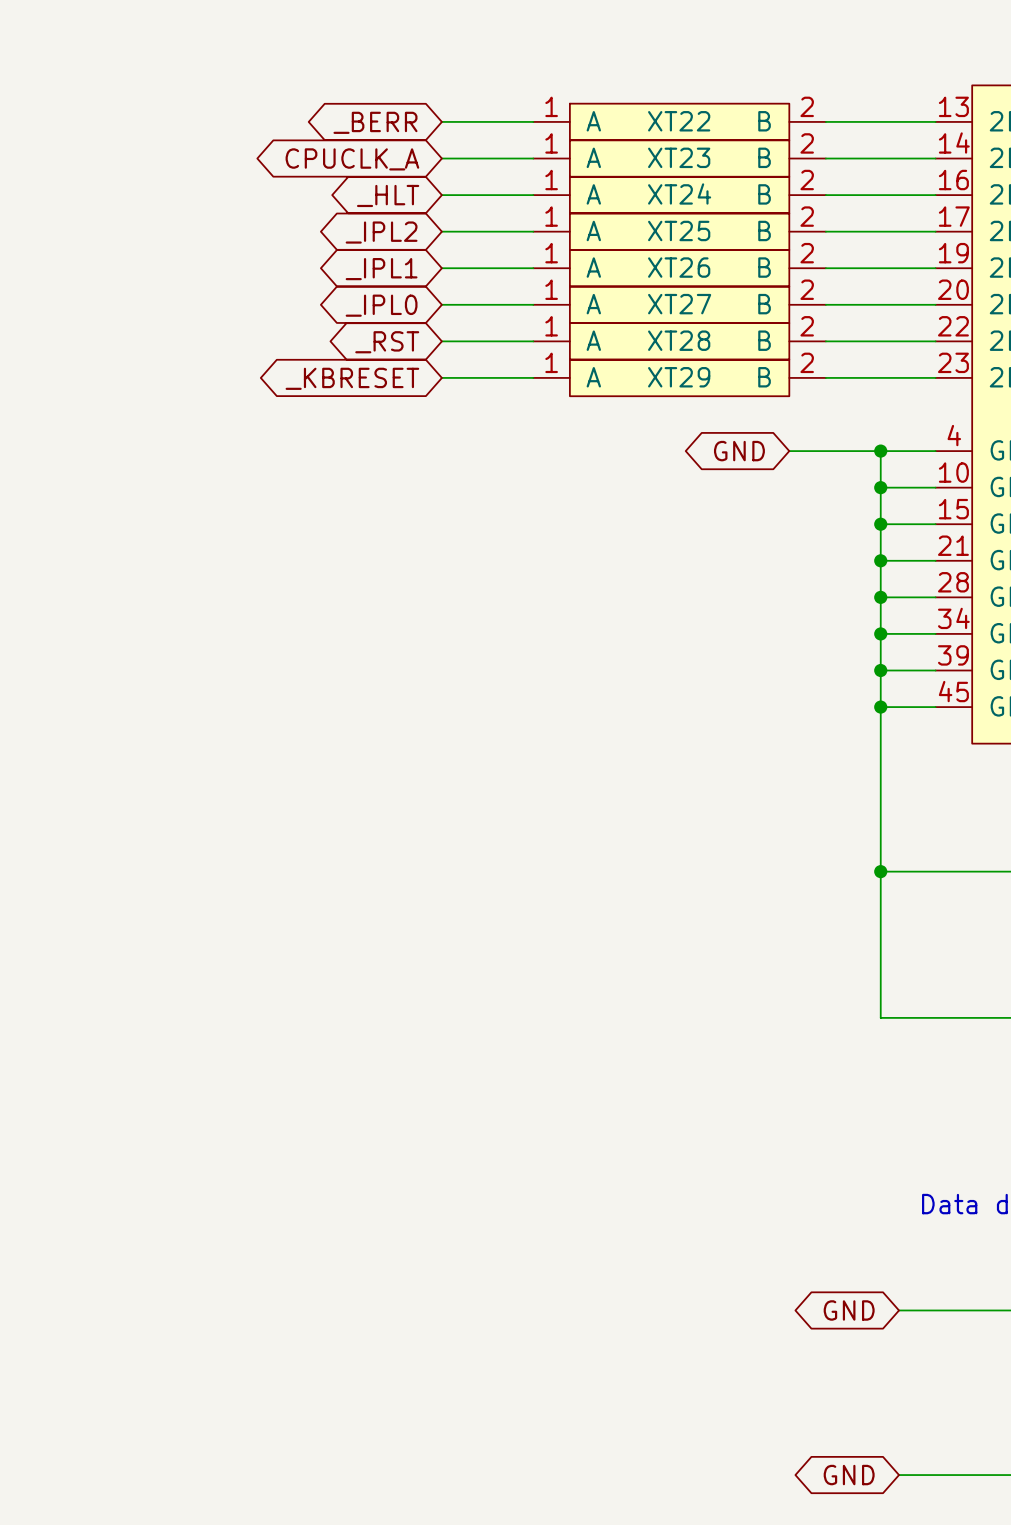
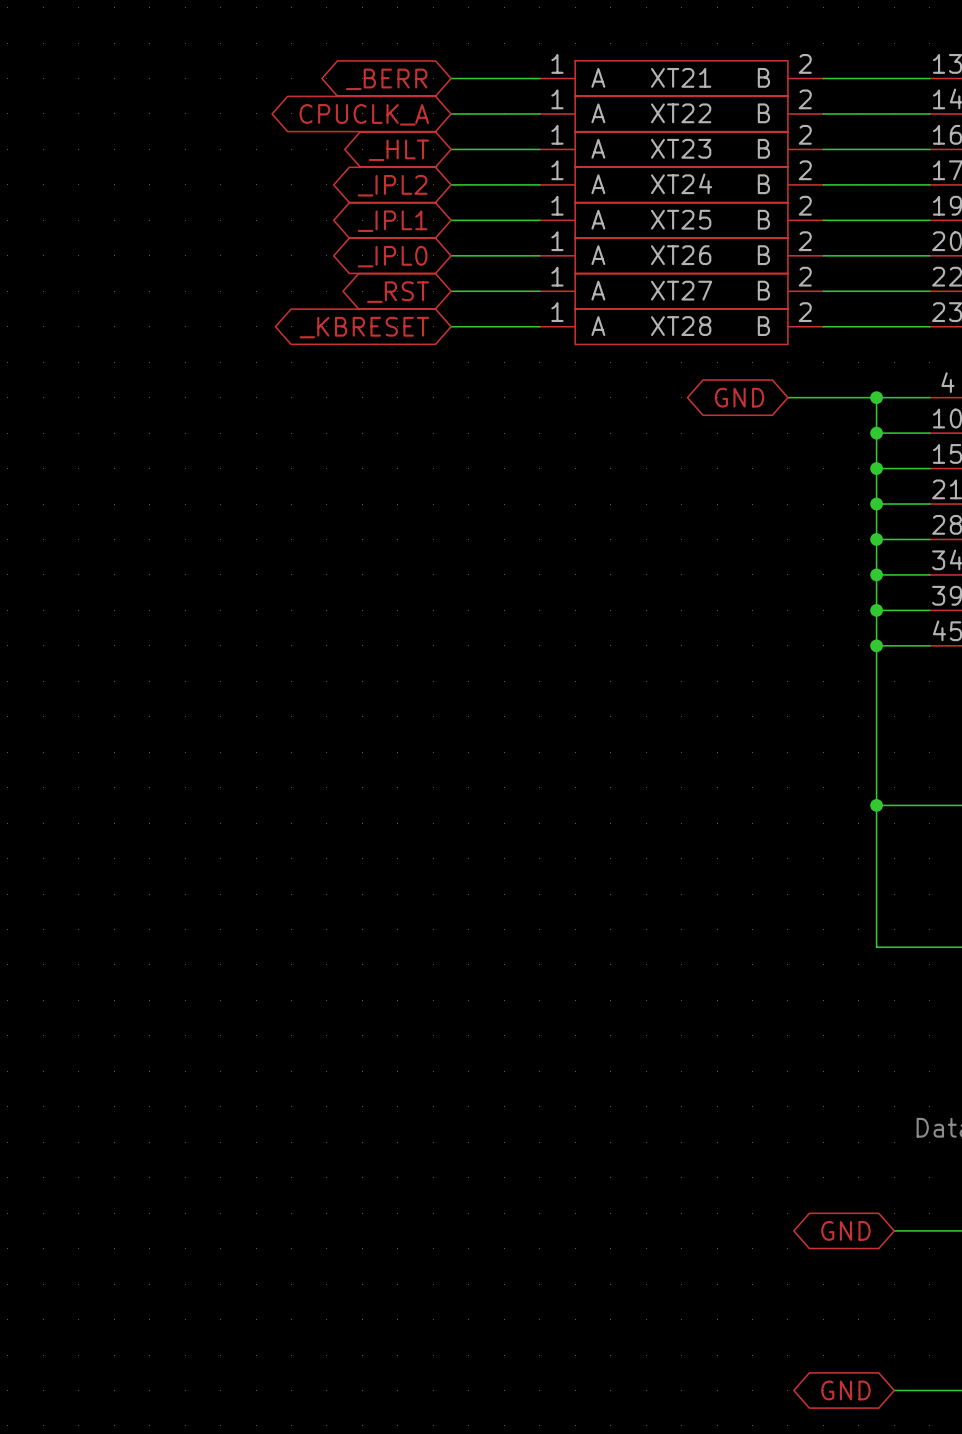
XT22 name: XT22 (679, 121) -> XT21 (681, 77)
XT23 name: XT23 (679, 157) -> XT22 (681, 113)
XT24 name: XT24 (679, 193) -> XT23 (681, 148)
XT25 name: XT25 (679, 230) -> XT24 (681, 183)
XT26 name: XT26 (679, 267) -> XT25 (681, 219)
XT27 name: XT27 (679, 304) -> XT26 (681, 255)
XT28 name: XT28 (679, 340) -> XT27 (681, 290)
XT29 name: XT29 (679, 377) -> XT28 (681, 326)

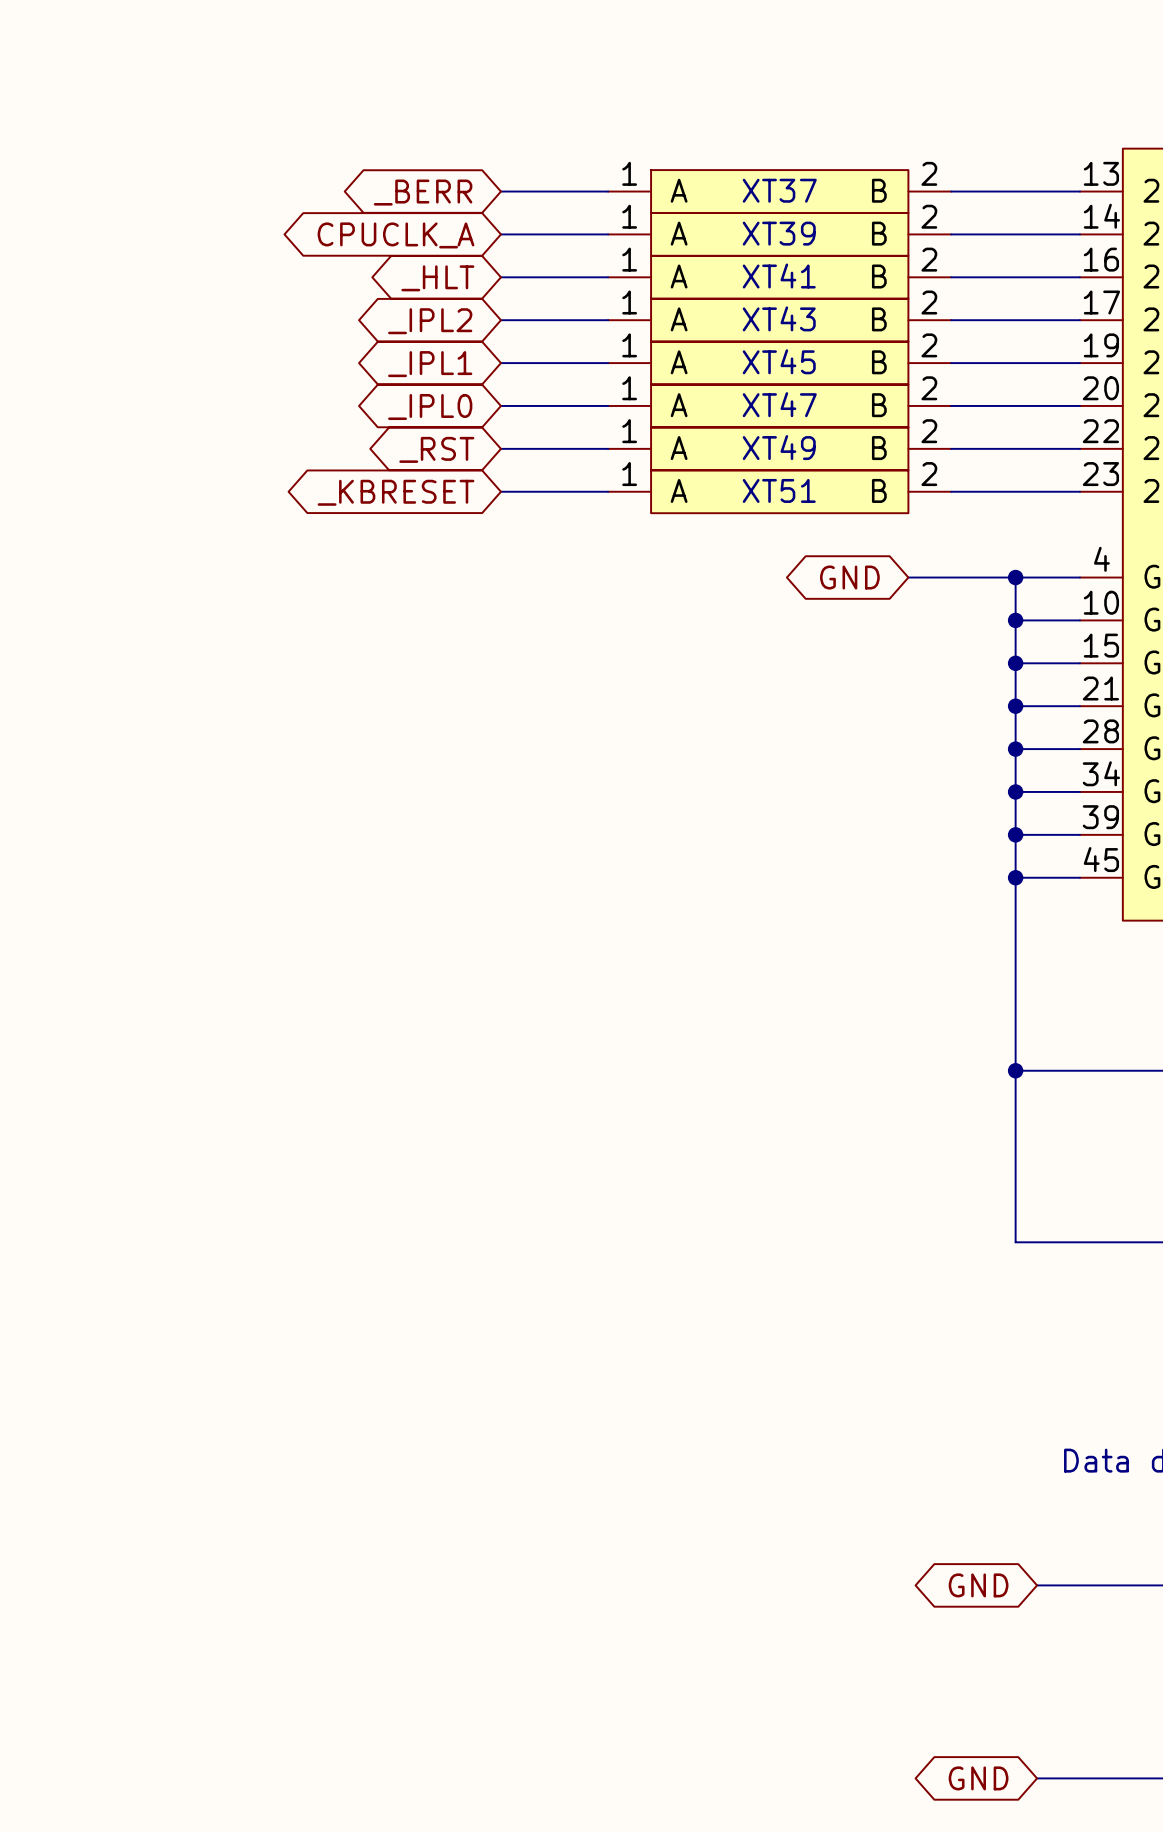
XT21 name: XT21 (681, 77) -> XT37 (779, 190)
XT22 name: XT22 (681, 113) -> XT39 (779, 233)
XT23 name: XT23 (681, 148) -> XT41 (779, 276)
XT24 name: XT24 (681, 183) -> XT43 (779, 318)
XT25 name: XT25 (681, 219) -> XT45 (779, 361)
XT26 name: XT26 (681, 255) -> XT47 (779, 404)
XT27 name: XT27 (681, 290) -> XT49 (779, 447)
XT28 name: XT28 (681, 326) -> XT51 (779, 490)

